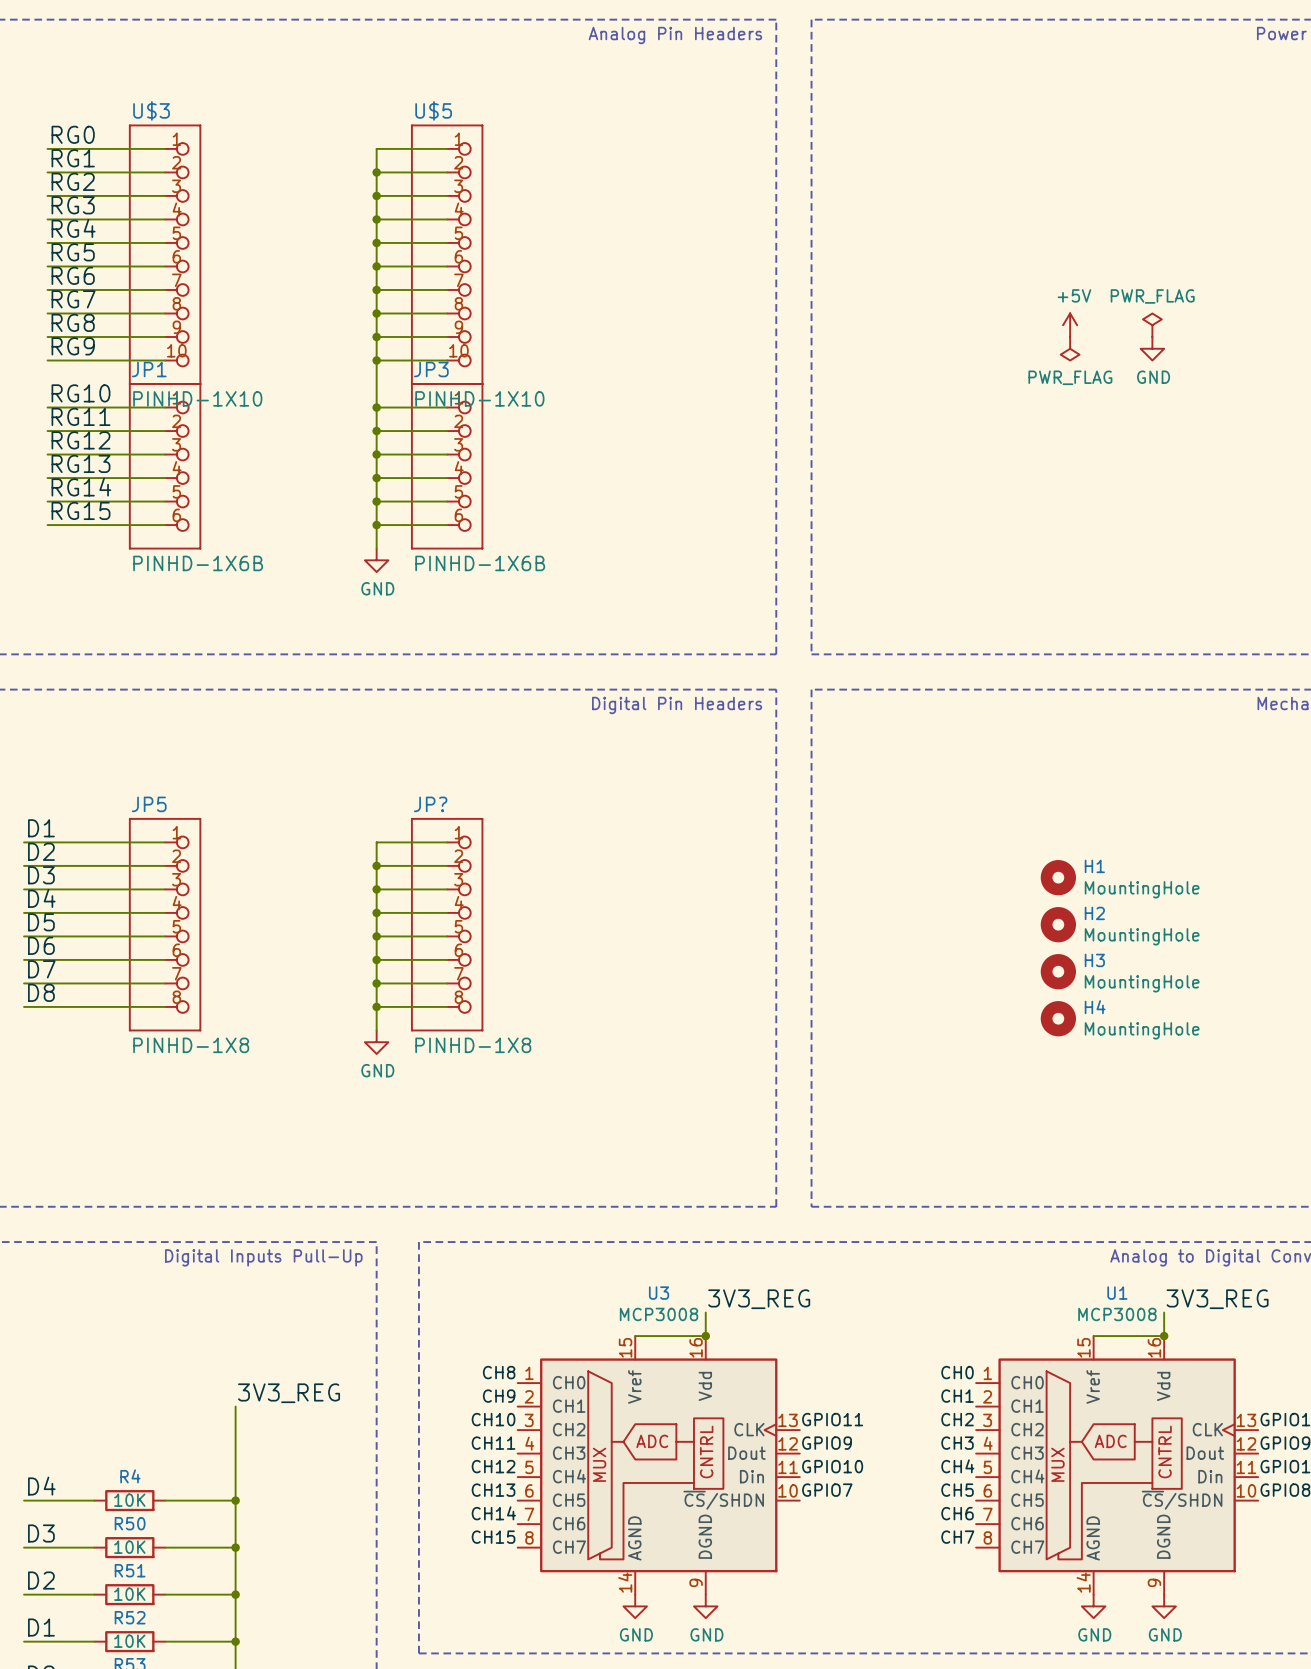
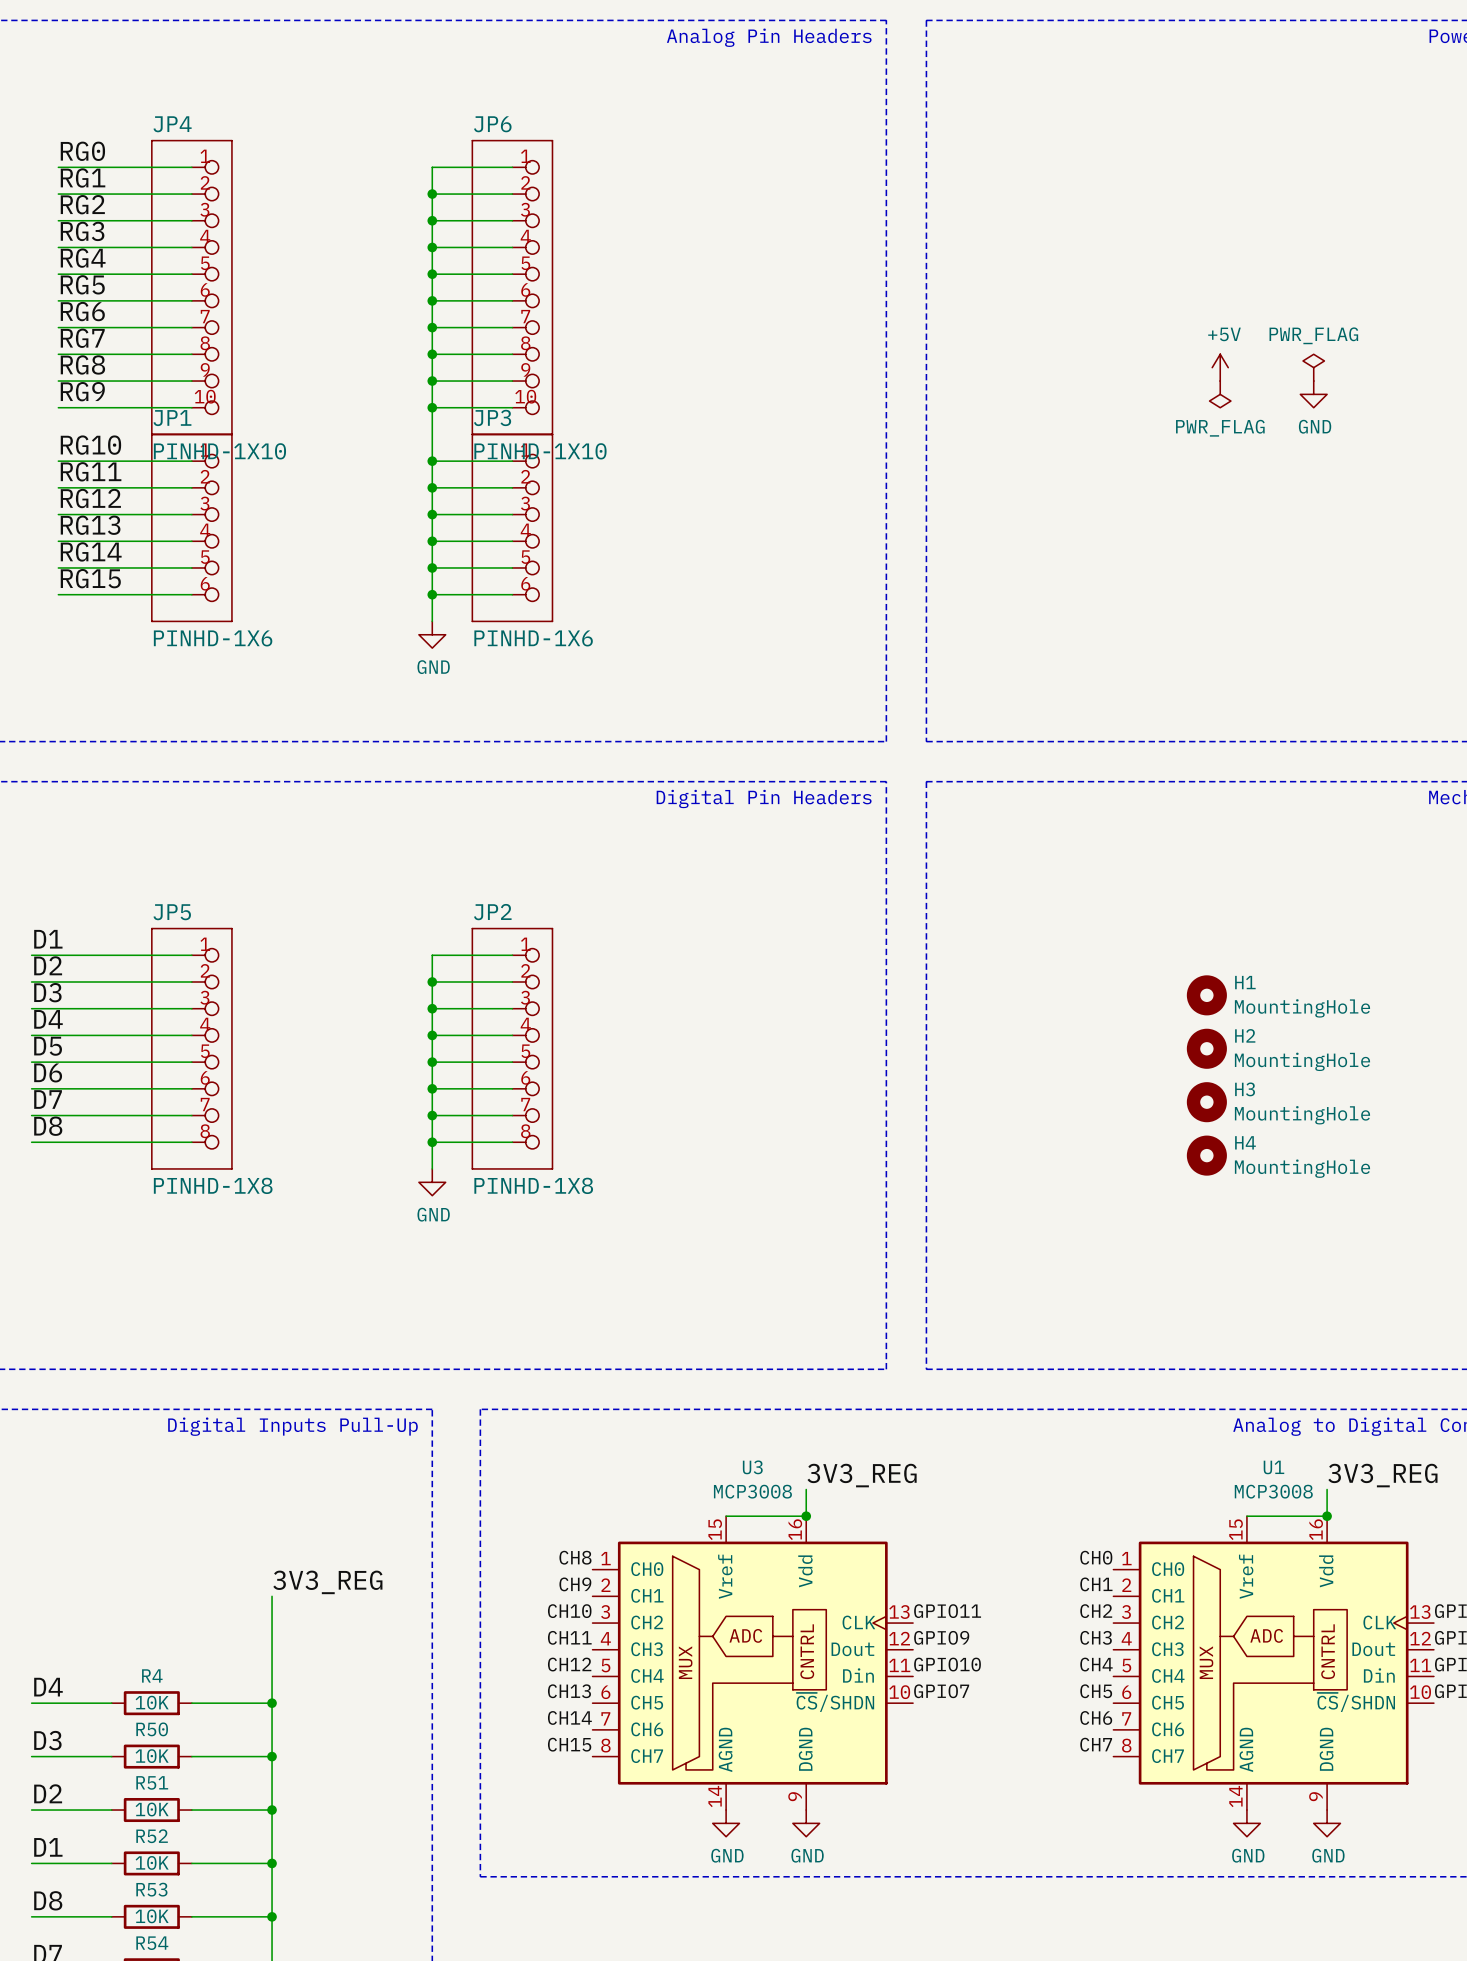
U$3 name: U$3 (151, 110) -> JP4 (172, 124)
U$5 name: U$5 (433, 110) -> JP6 (492, 124)
JP1 value: PINHD-1X6B (198, 563) -> PINHD-1X6 (213, 638)
JP3 value: PINHD-1X6B (480, 563) -> PINHD-1X6 (533, 638)
JP? name: JP? (430, 804) -> JP2 (492, 912)

